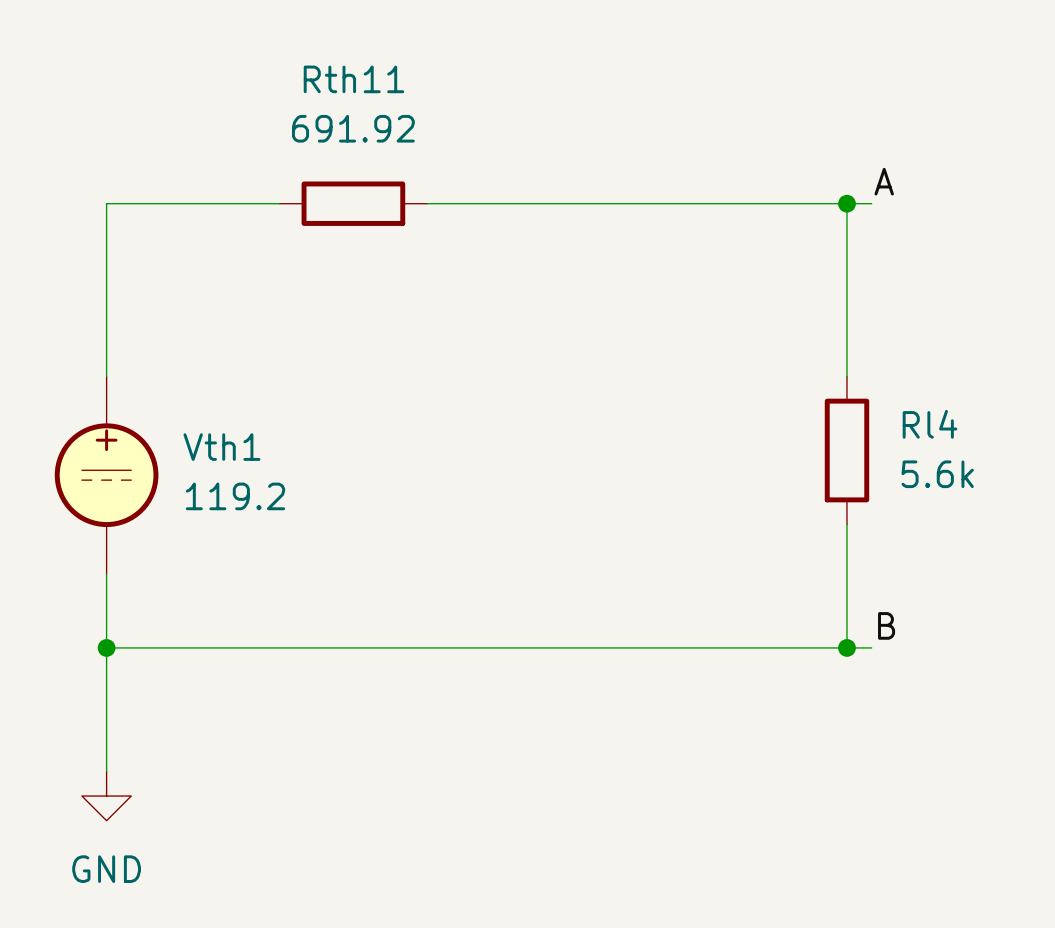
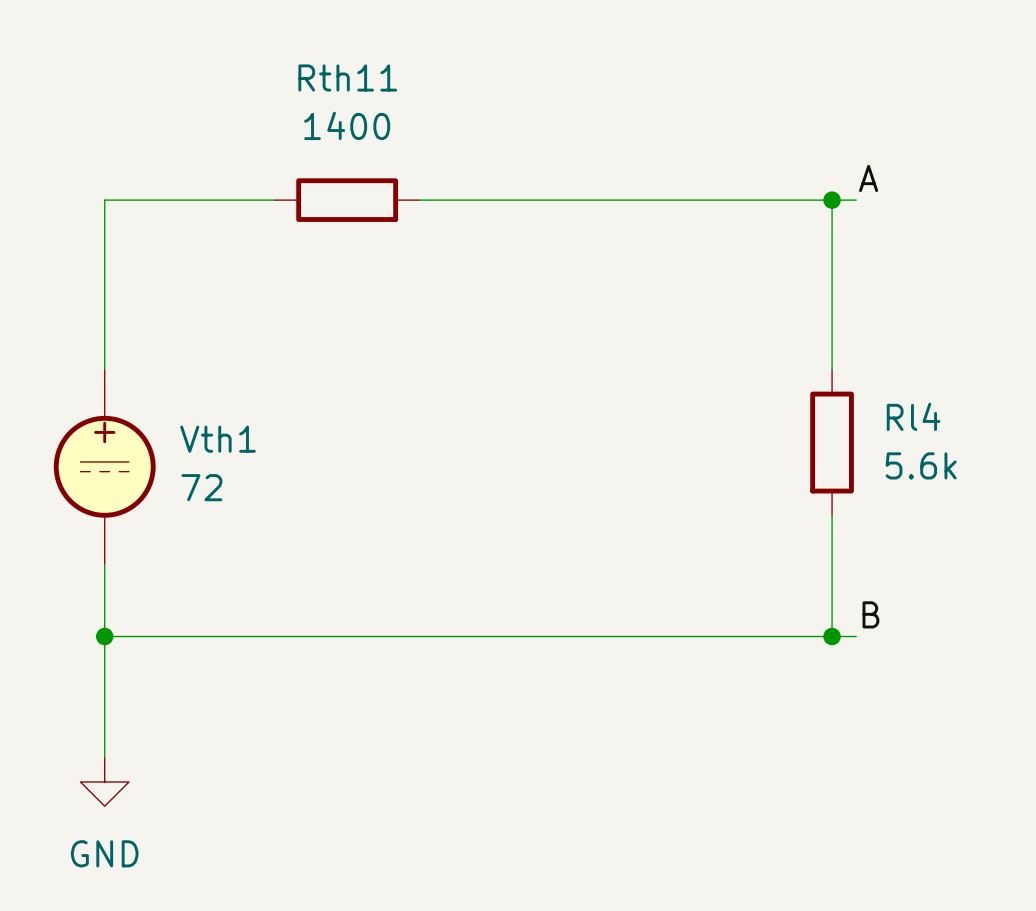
Rth11 value: 691.92 (353, 128) -> 1400 (347, 125)
Vth1 value: 119.2 (235, 496) -> 72 (201, 487)

